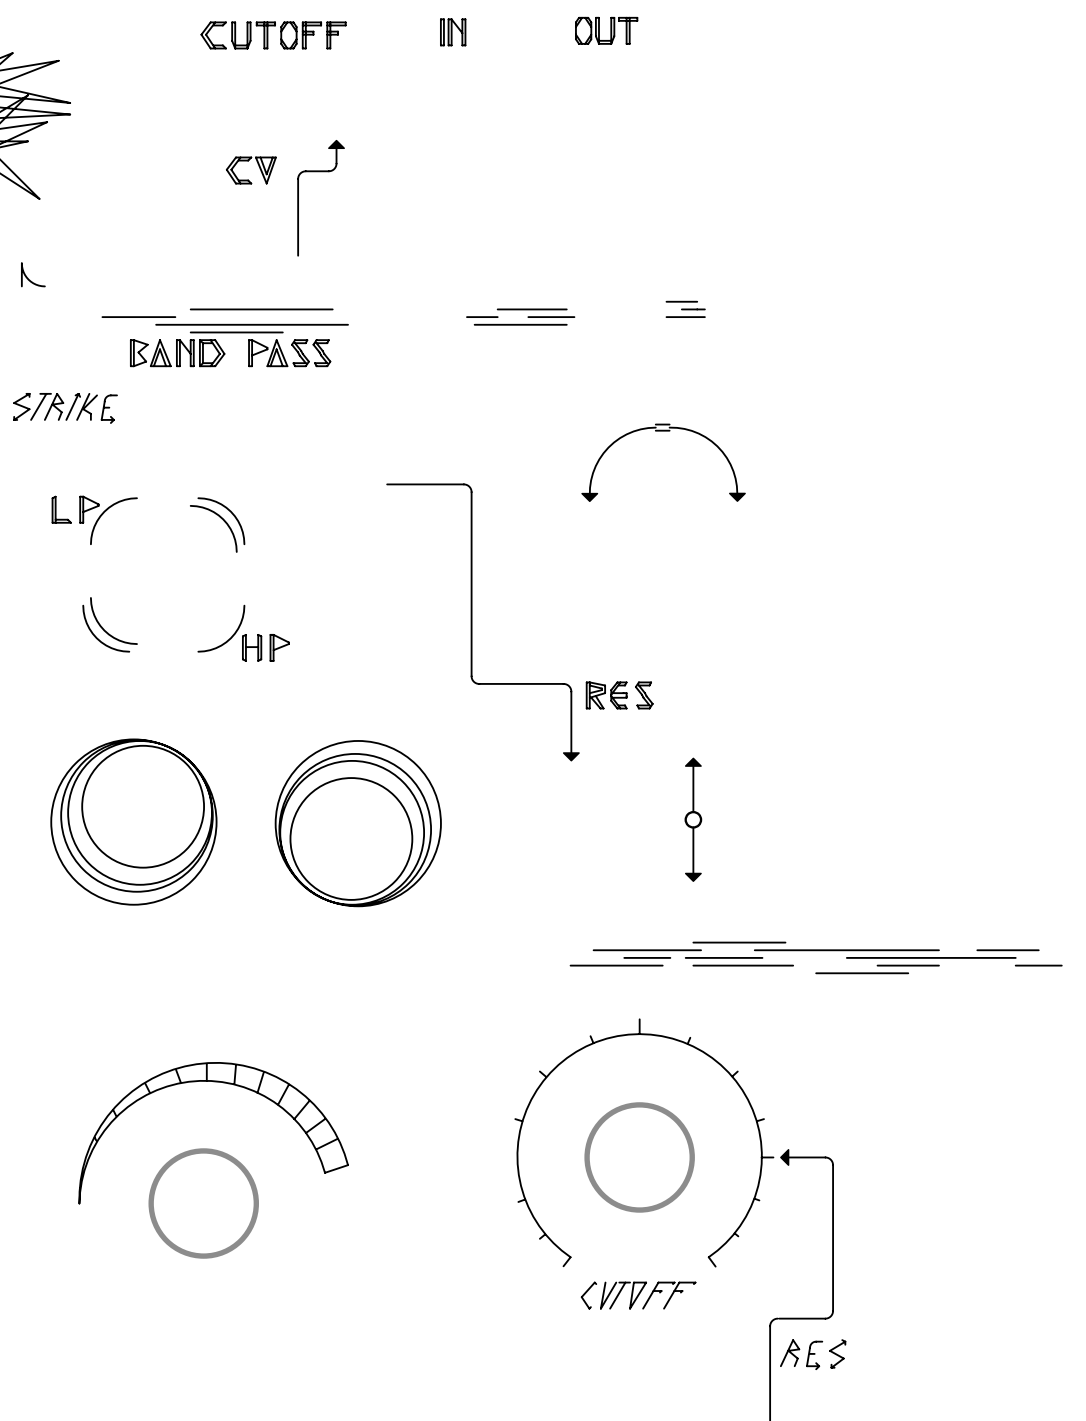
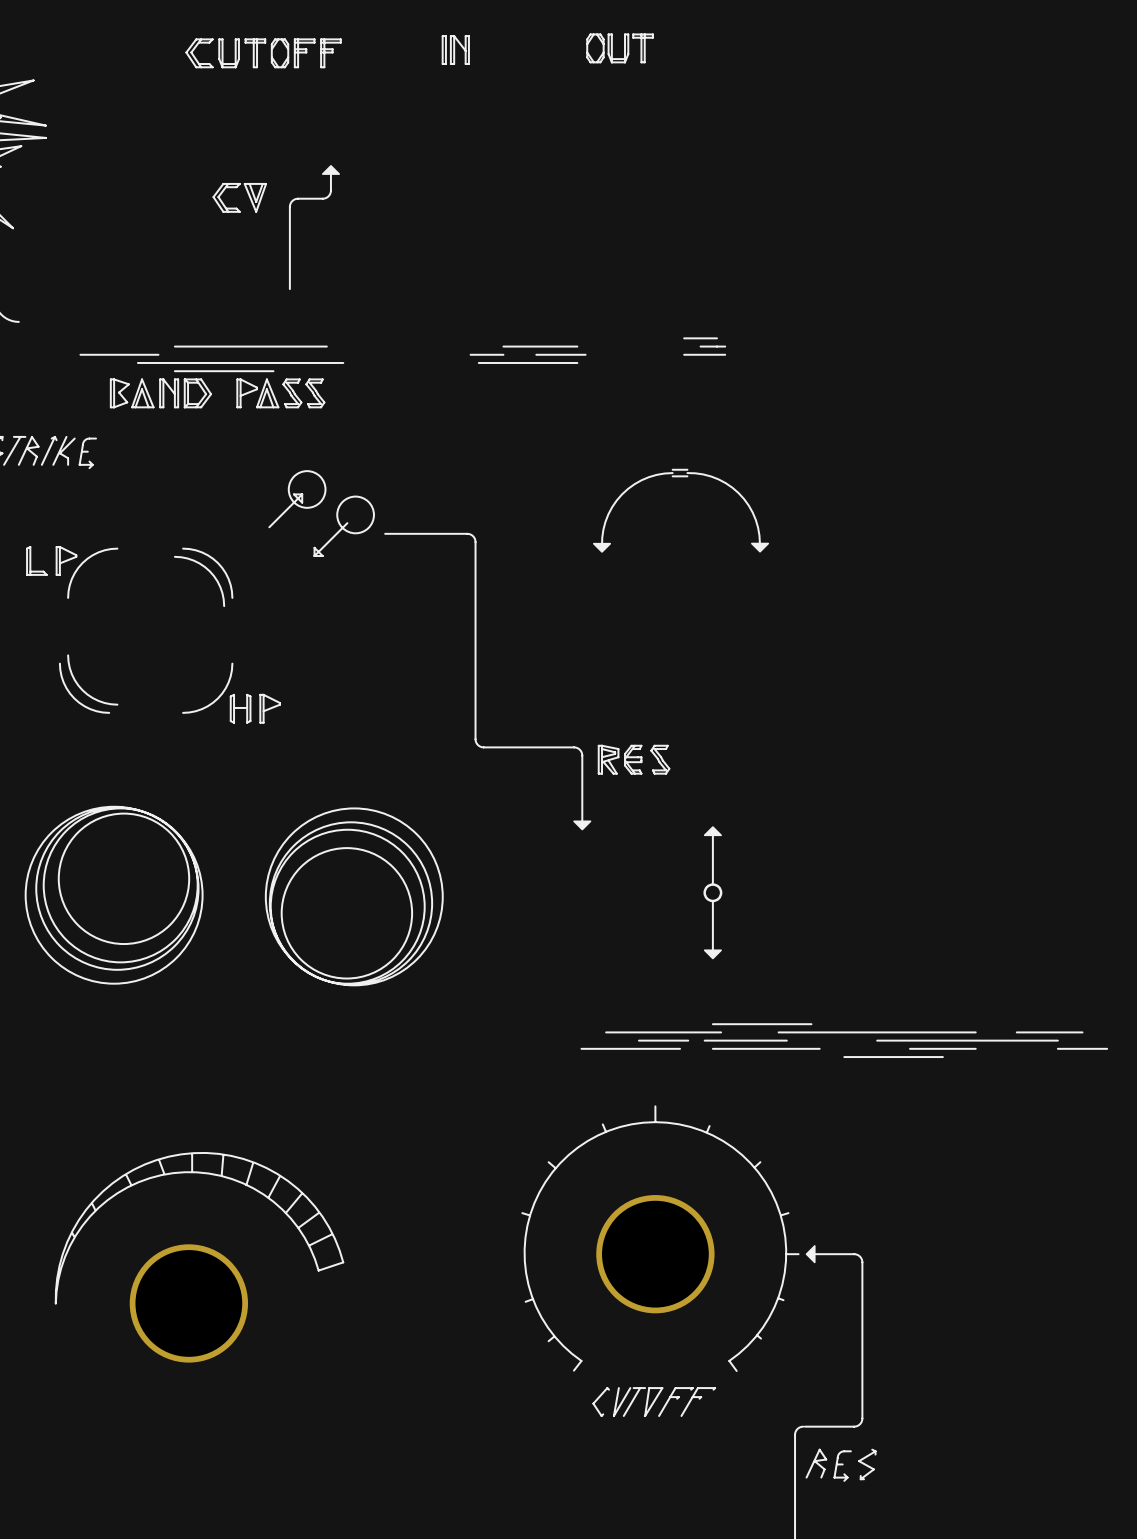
drawing: none -> [287, 470, 375, 535]
line: none -> (302, 494) (302, 502) (294, 494) (302, 494)
line: none -> (302, 494) (269, 527)
line: none -> (347, 523) (314, 556)
line: none -> (314, 556) (322, 556) (314, 547) (314, 556)

